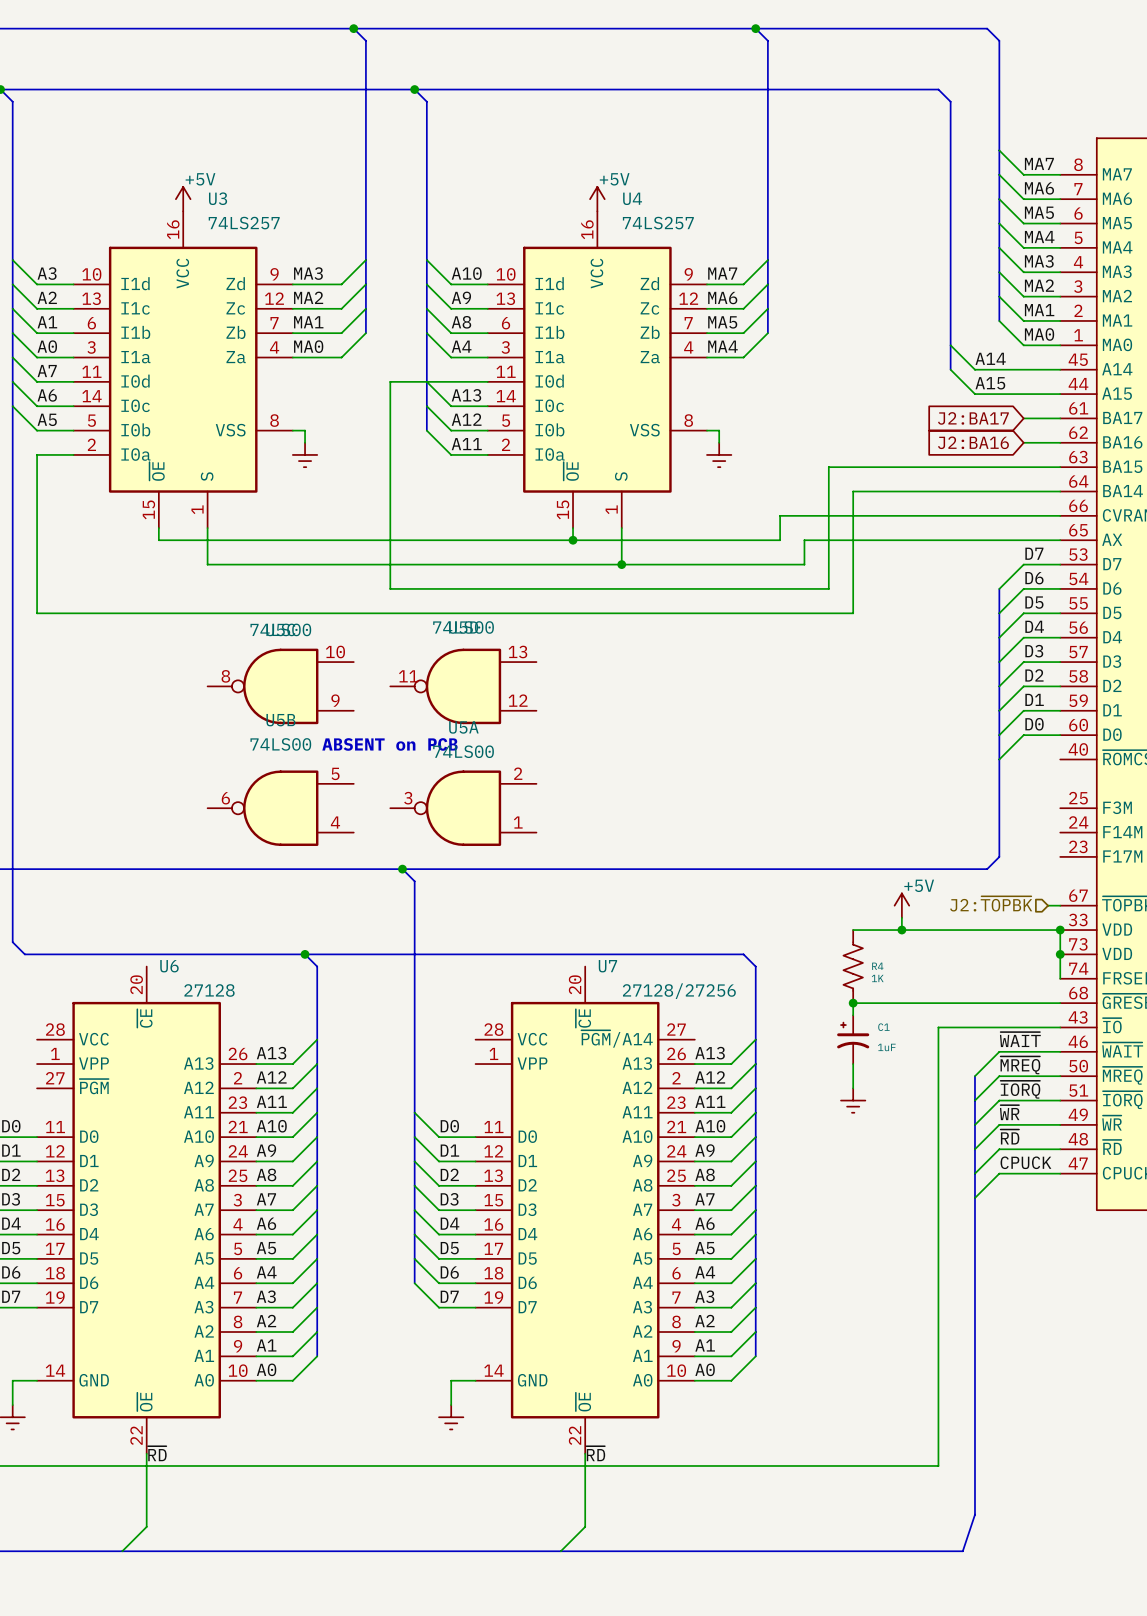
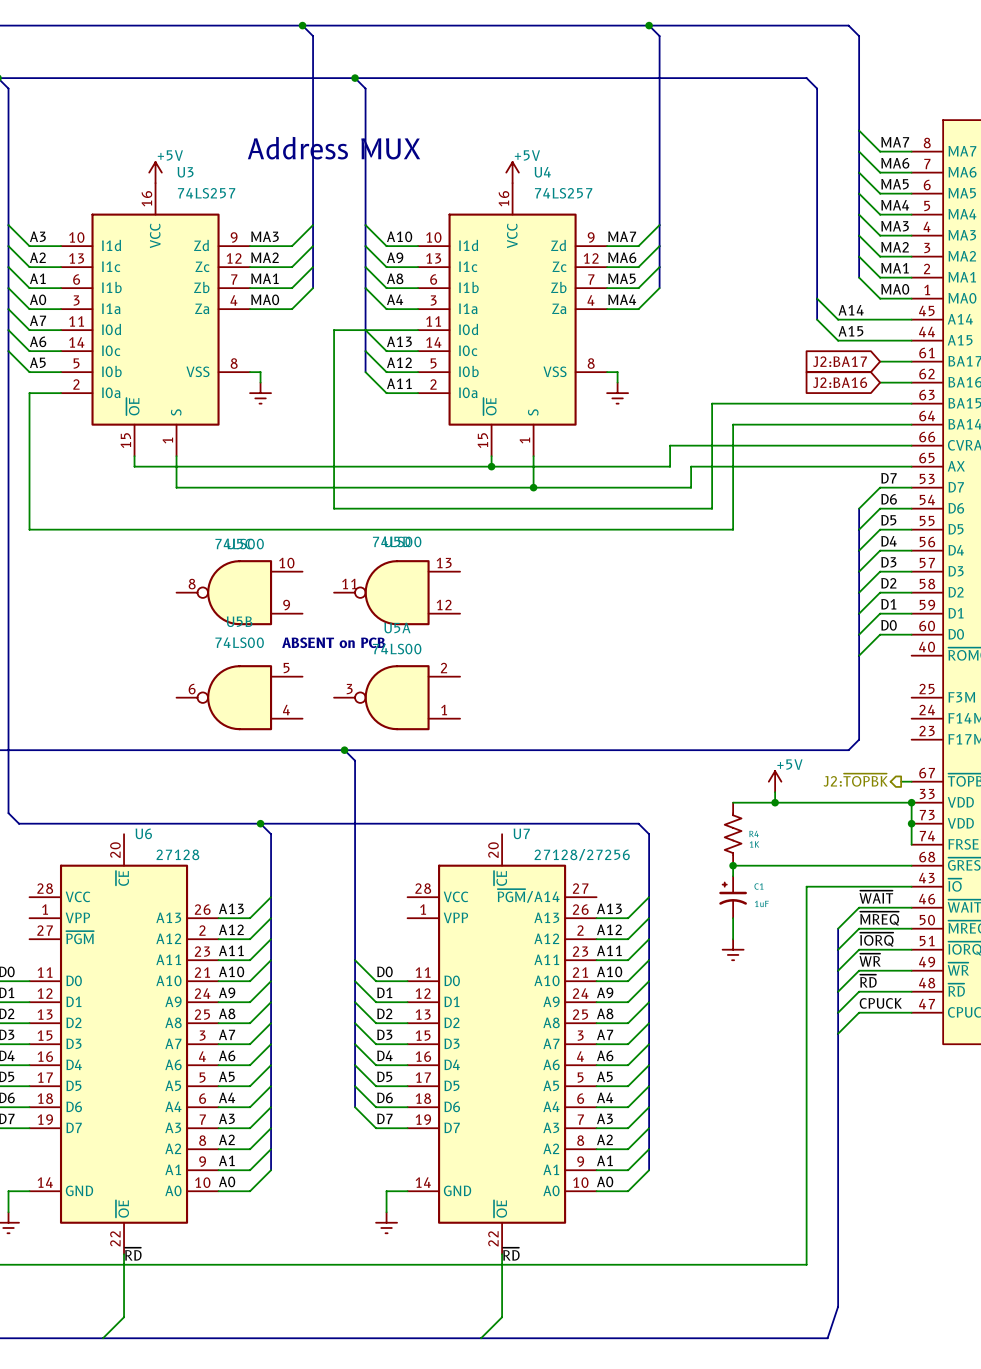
text: none -> Address MUX (334, 148)
hierarchical label shape: input (991, 903) -> output (855, 780)

